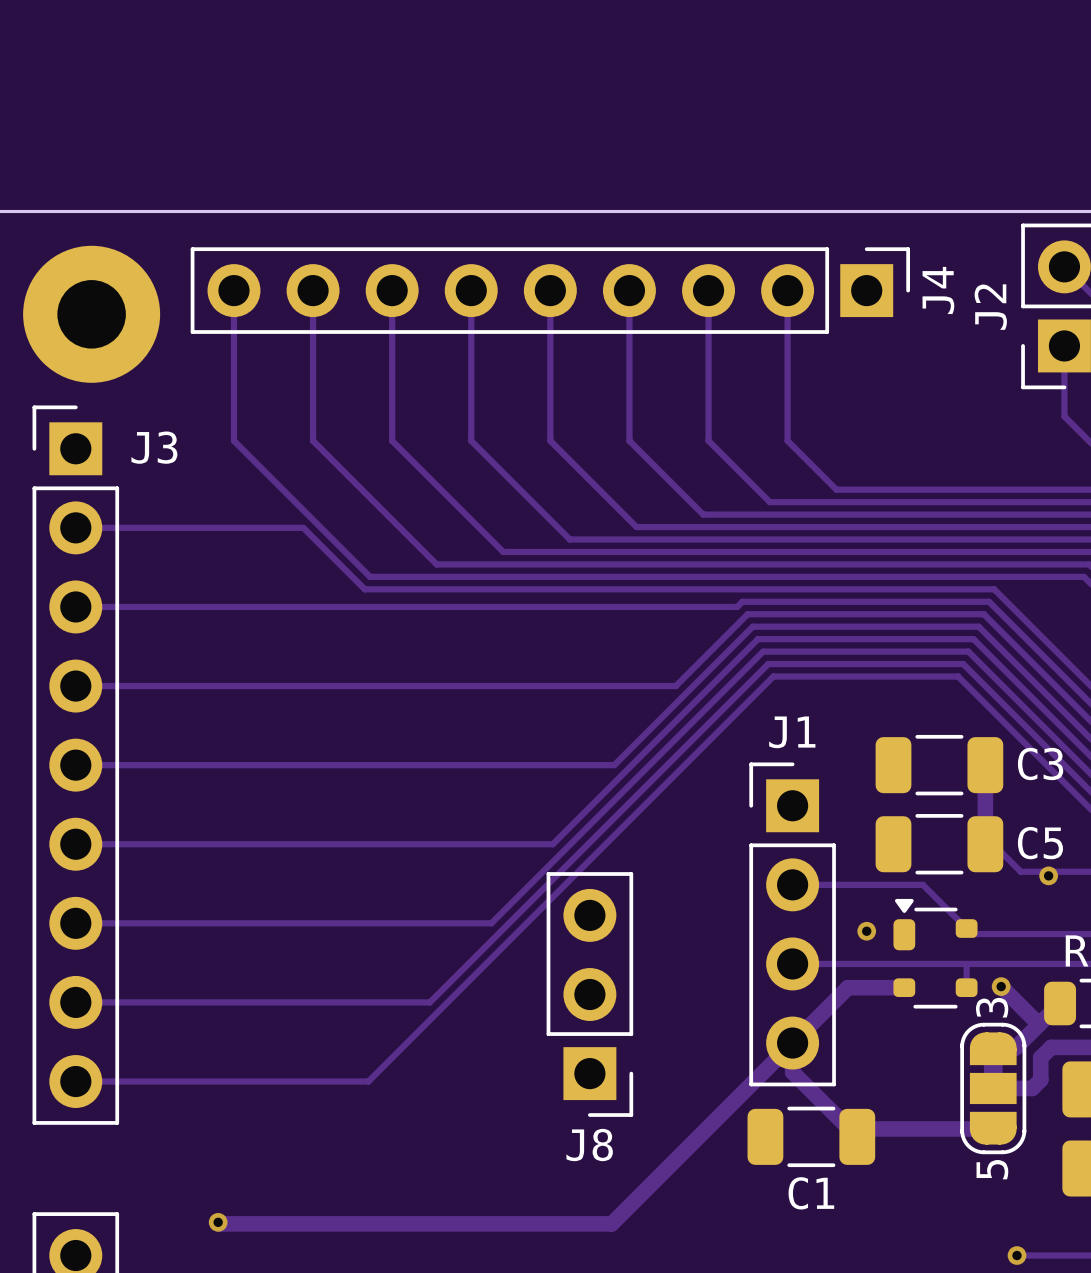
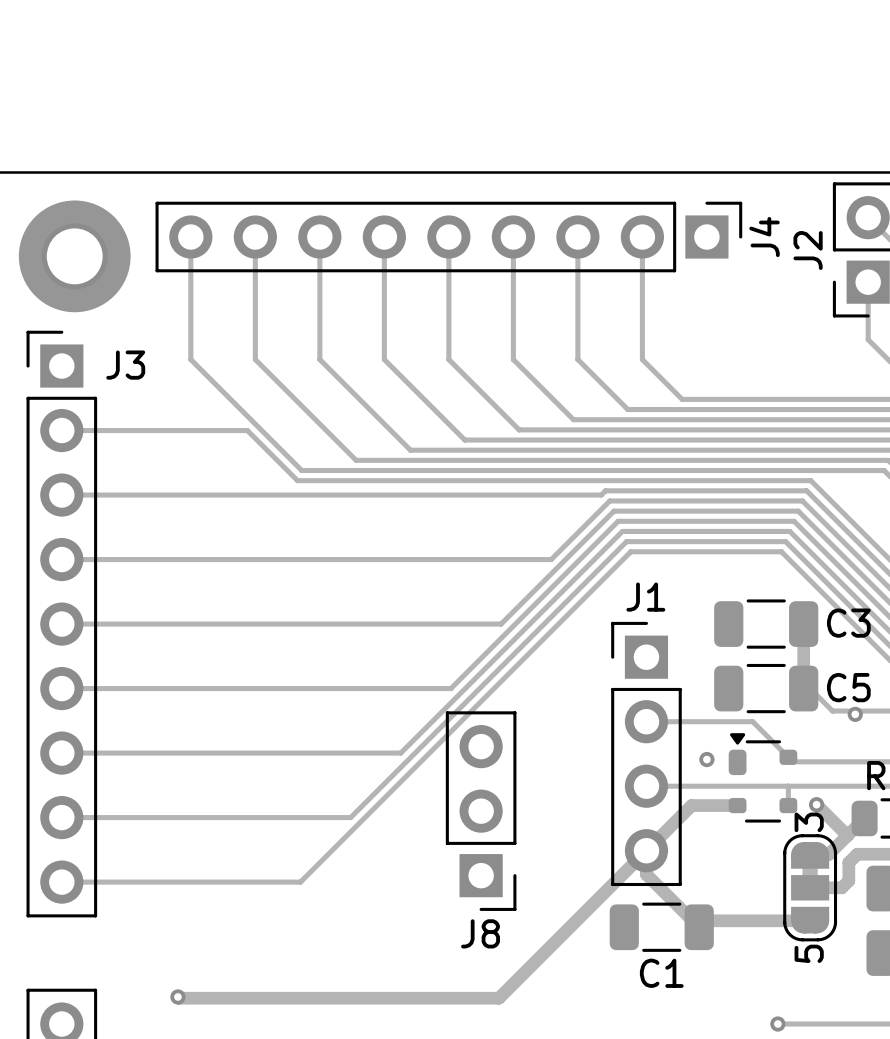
track: none -> (777, 1024) (829, 1024)
via: none -> (777, 1024)
via: (1017, 1255) -> none

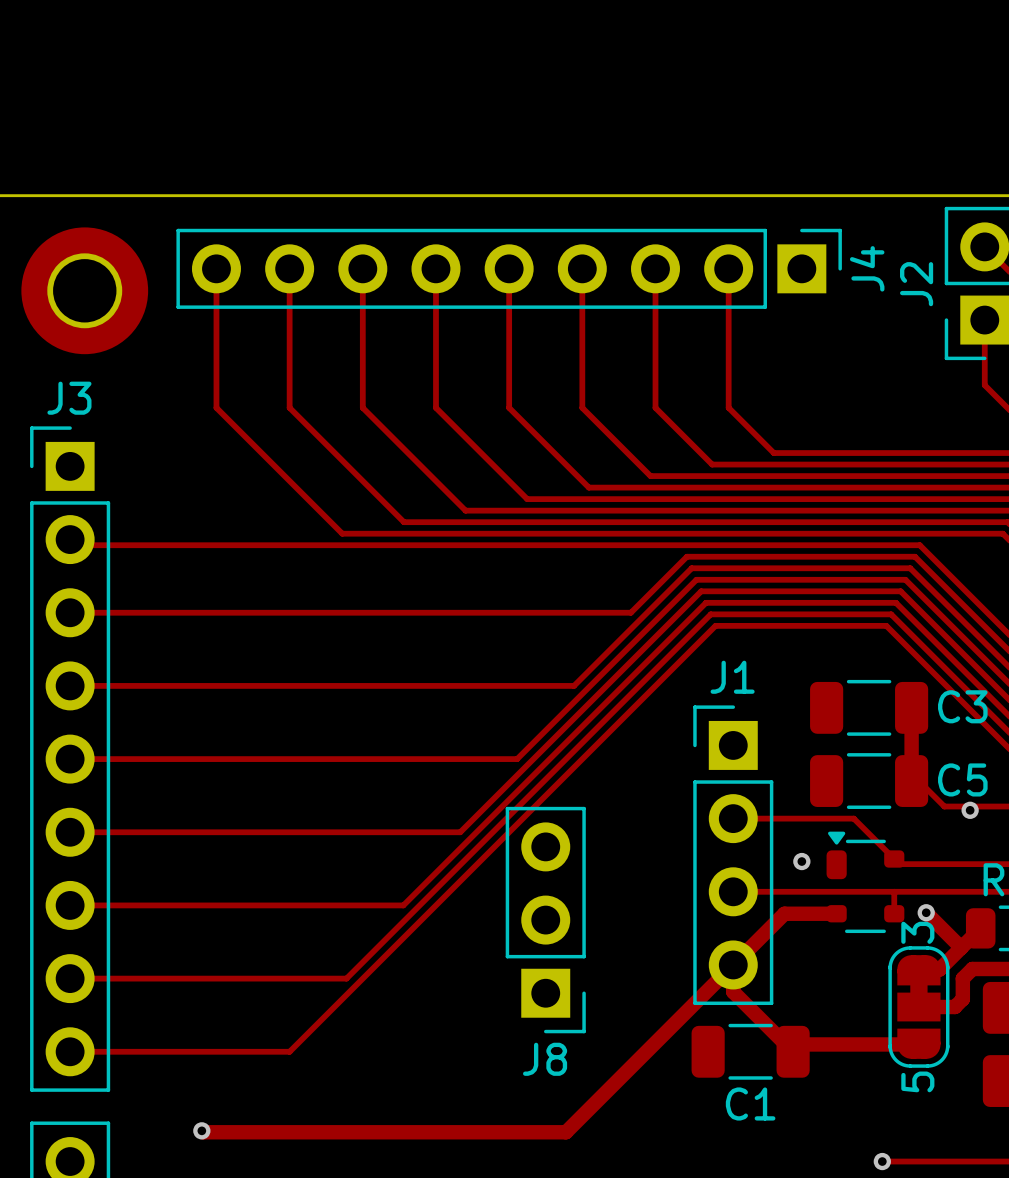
J3 name position: J3 (125, 365) -> J3 (69, 398)
track: (61, 430) (247, 430) (297, 480) -> (70, 539) (75, 545) (337, 545)
track: (61, 495) (601, 495) -> (70, 612) (630, 612) (682, 561)
track: (61, 559) (551, 559) -> (70, 685) (574, 685) (625, 634)
track: (61, 624) (501, 624) -> (70, 759) (517, 759) (568, 707)
J3 position: (61, 624) -> (70, 759)
track: (61, 688) (450, 688) -> (70, 832) (460, 832) (511, 781)
track: (61, 753) (400, 753) -> (70, 905) (403, 905) (454, 854)
track: (61, 817) (350, 817) -> (70, 978) (346, 978) (397, 927)
track: (61, 882) (300, 882) -> (70, 1051) (289, 1051) (340, 1000)

